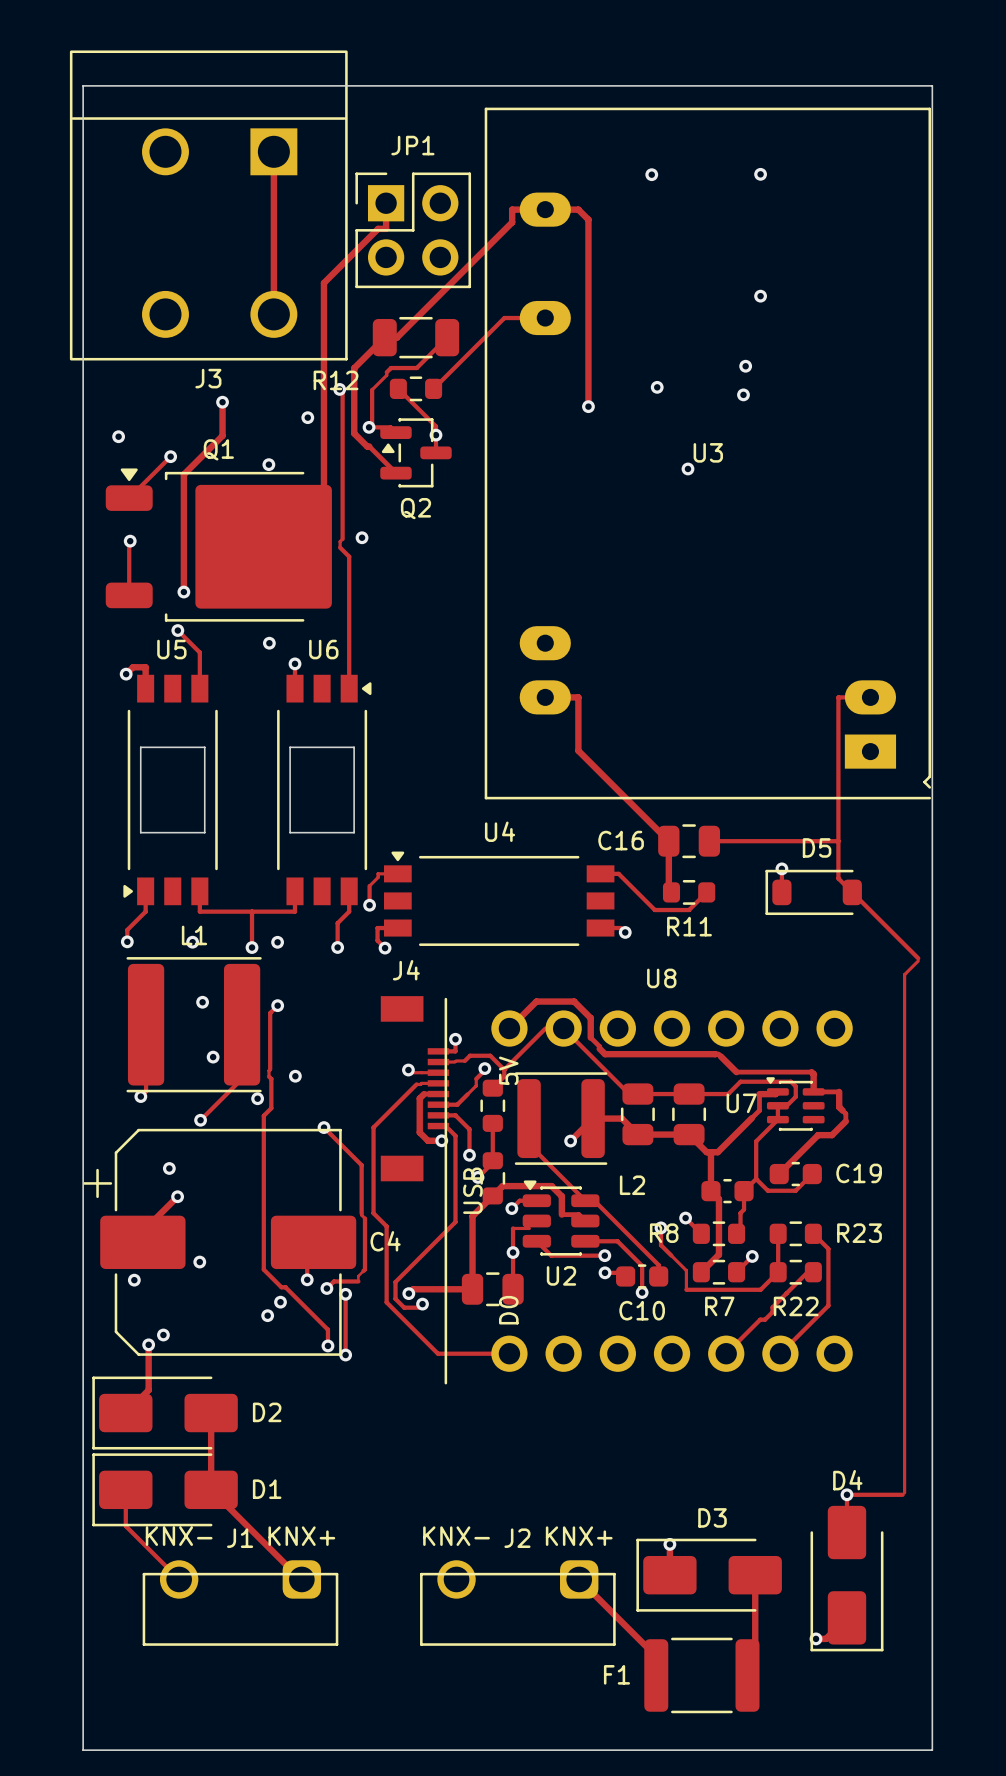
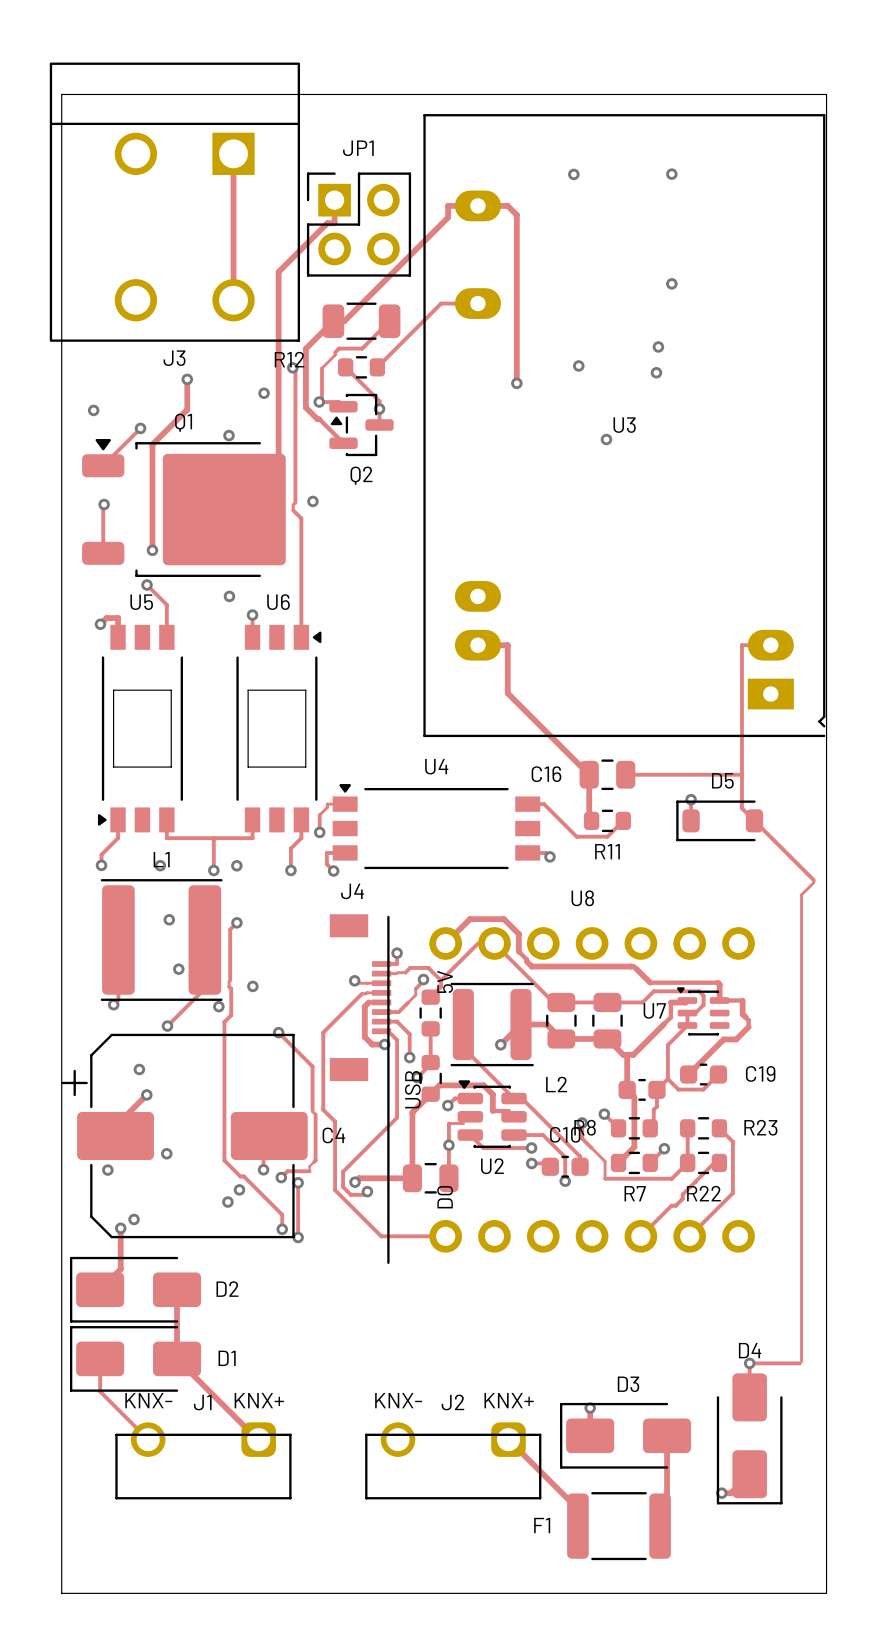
C10 name position: C10 (642, 1310) -> C10 (565, 1134)

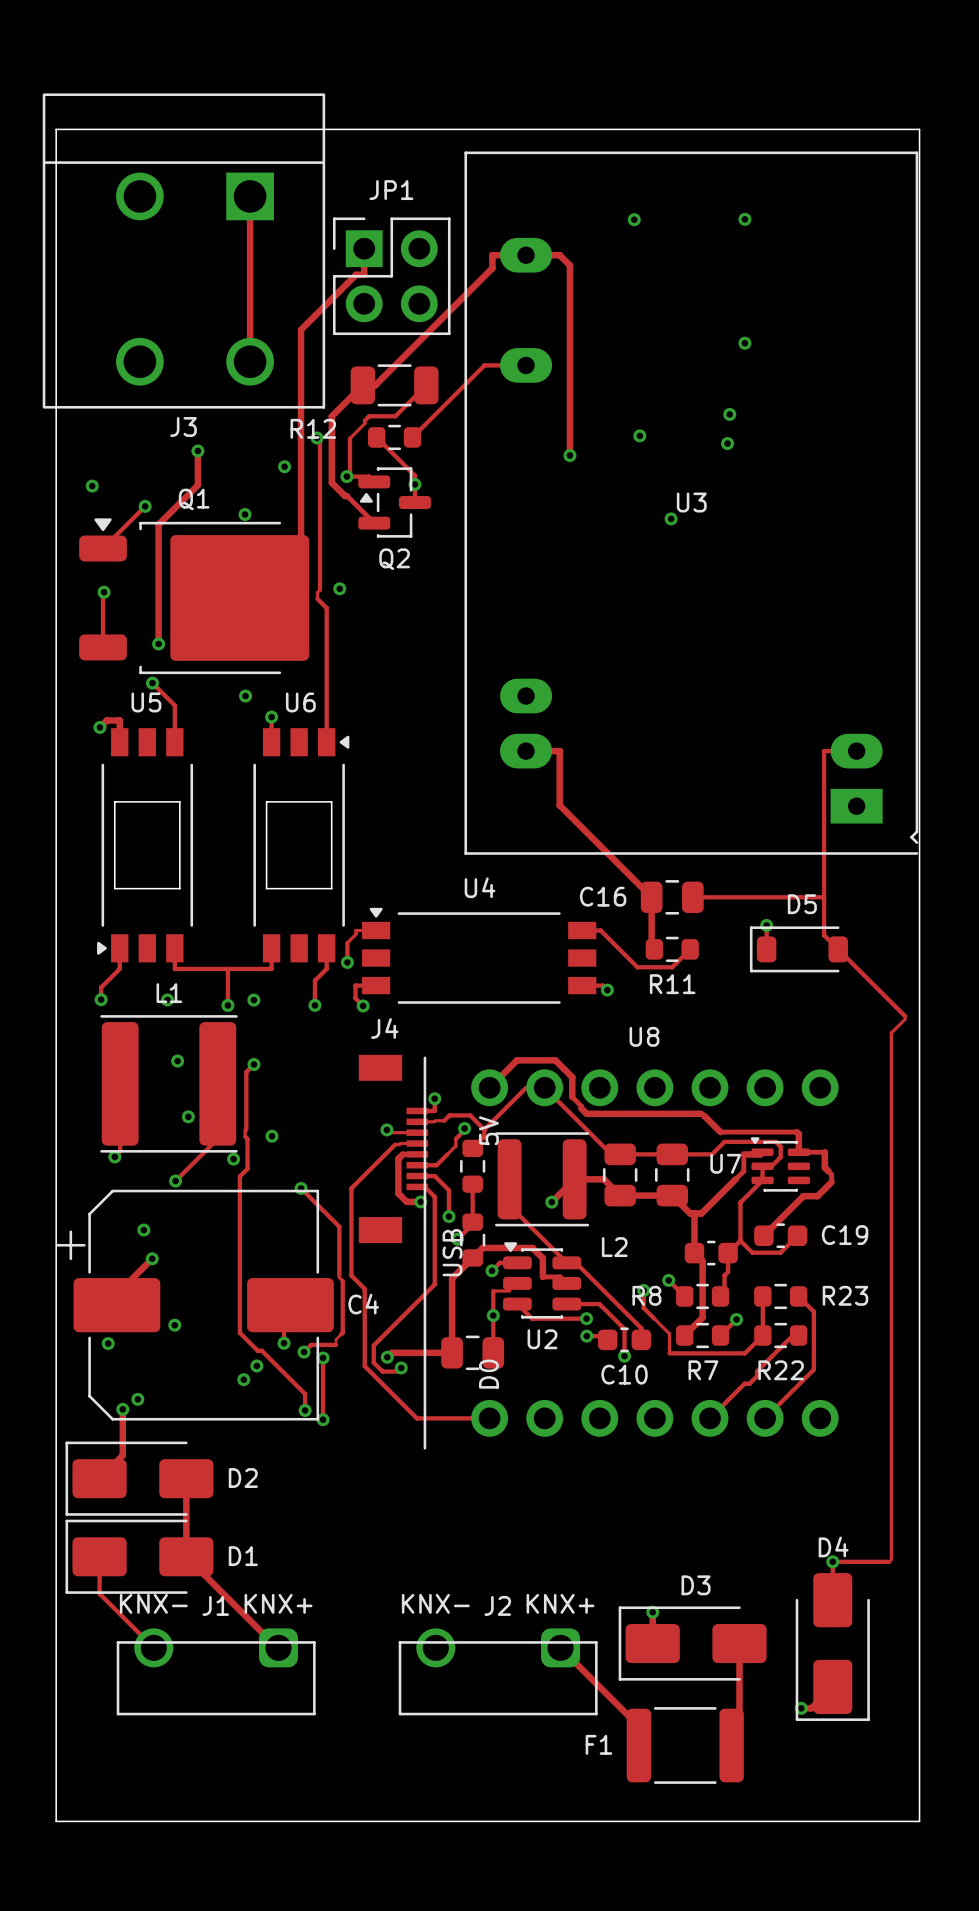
C10 name position: C10 (565, 1134) -> C10 (624, 1374)

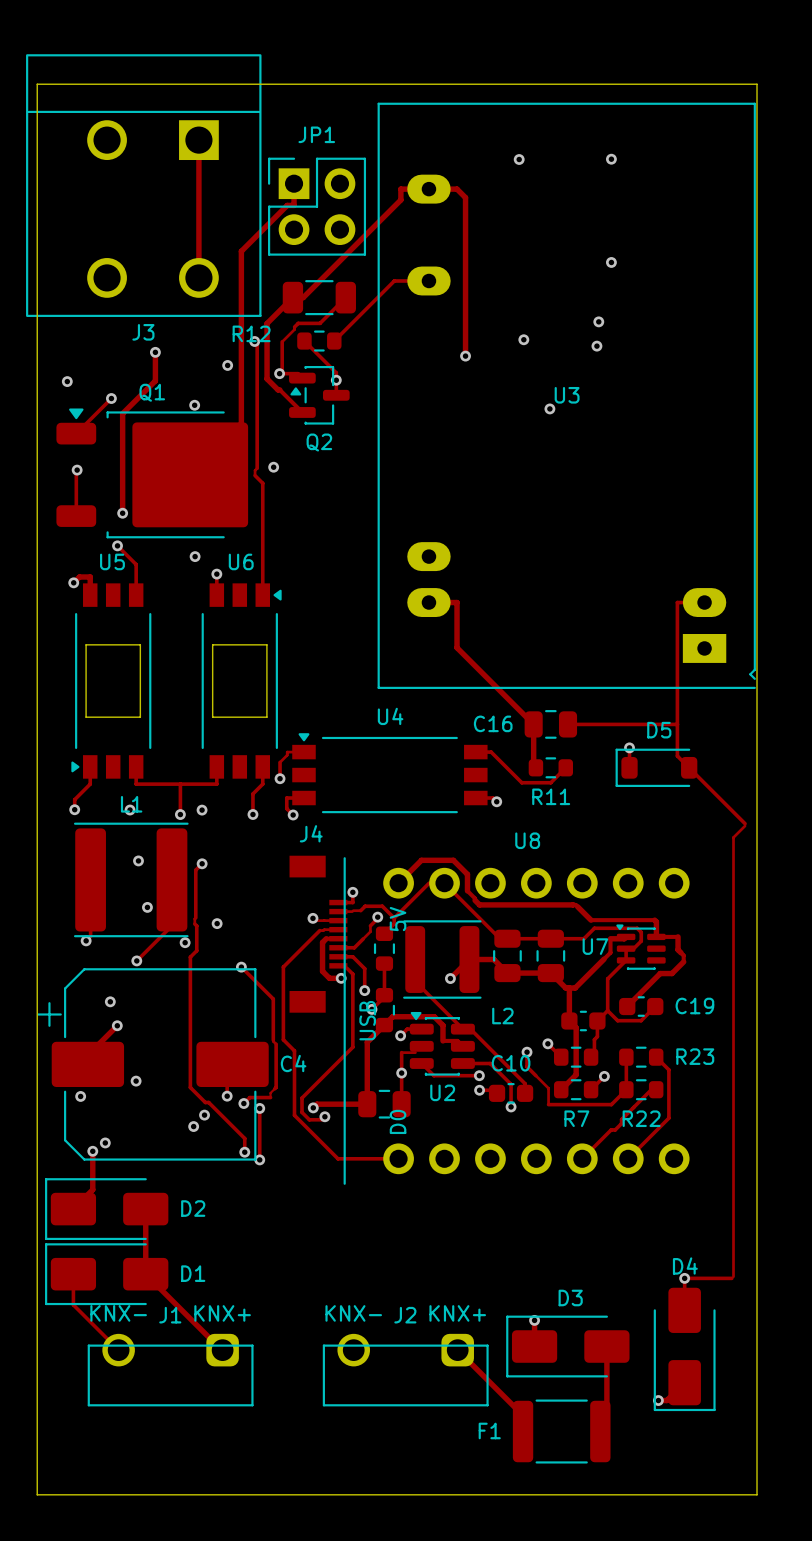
R8 name: R8 (646, 1295) -> none
C10 name position: C10 (624, 1374) -> C10 (511, 1063)

